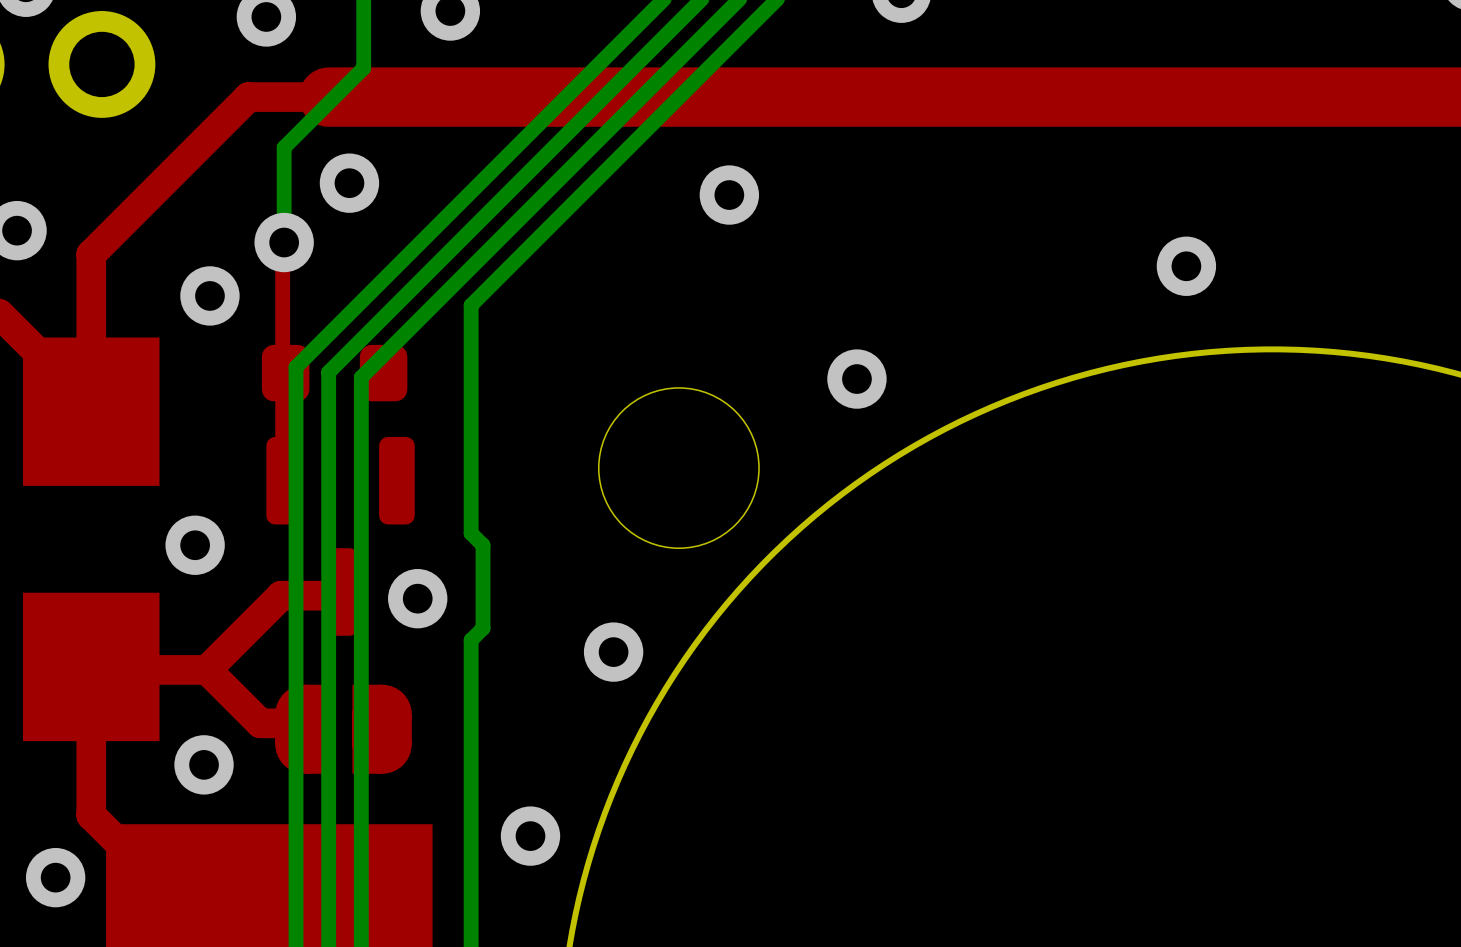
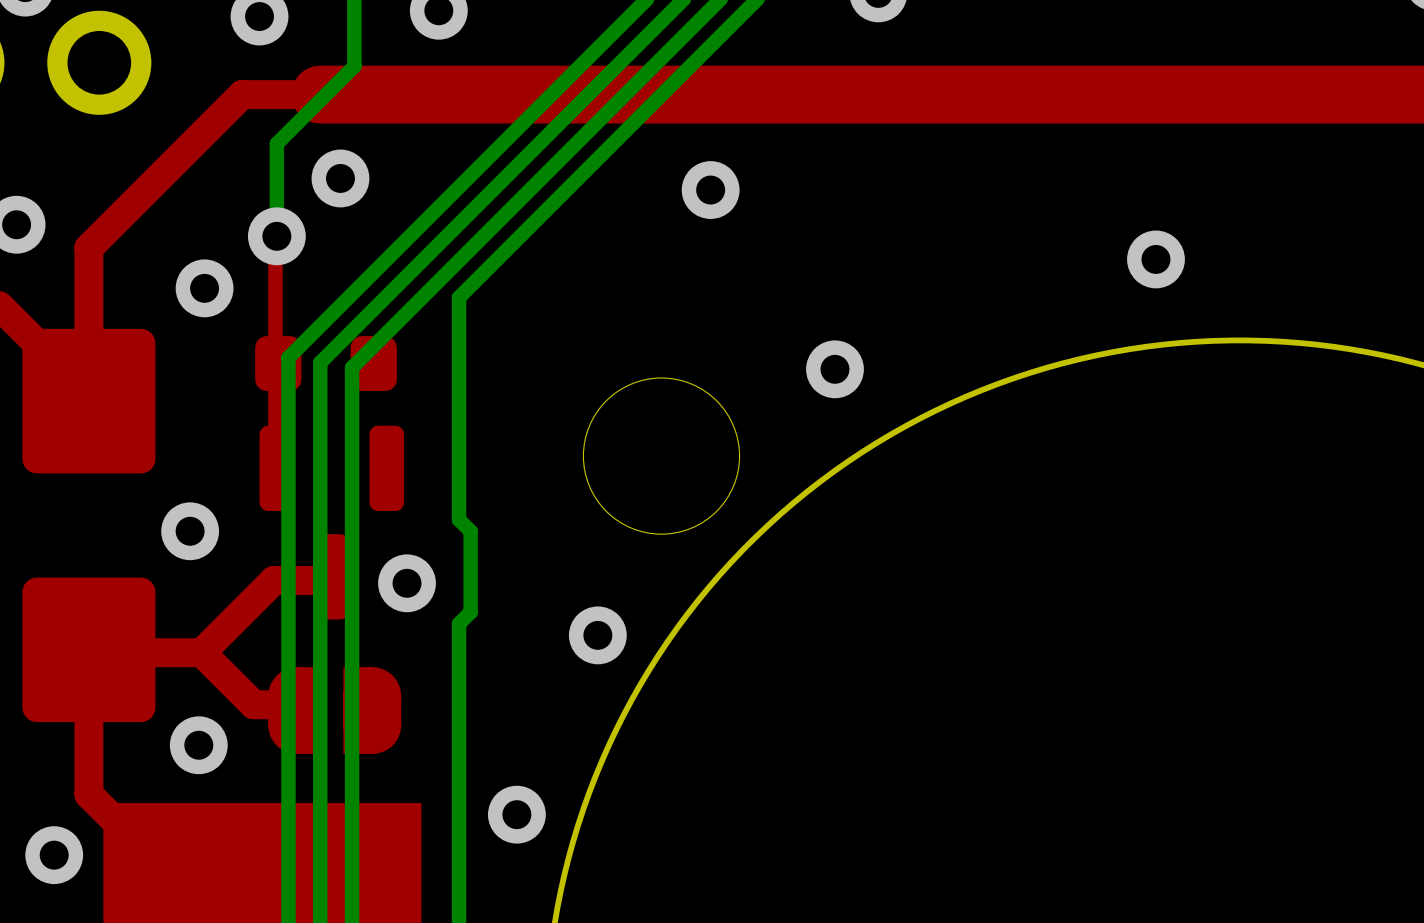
part footprint: [22, 337, 160, 742] -> [22, 328, 156, 723]

